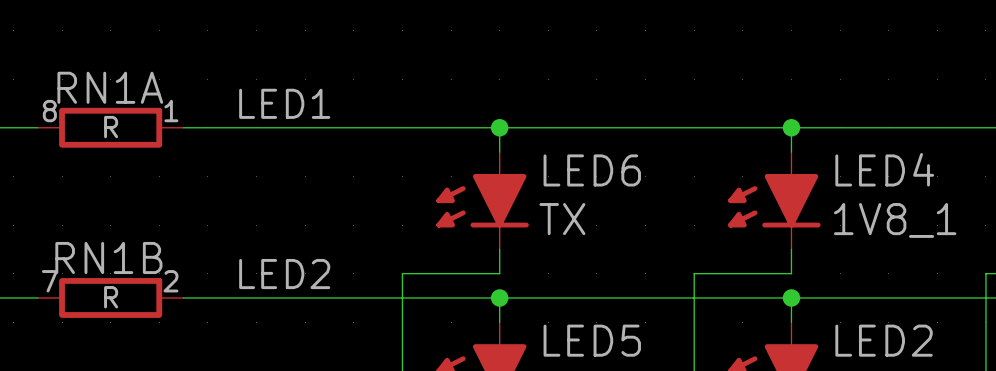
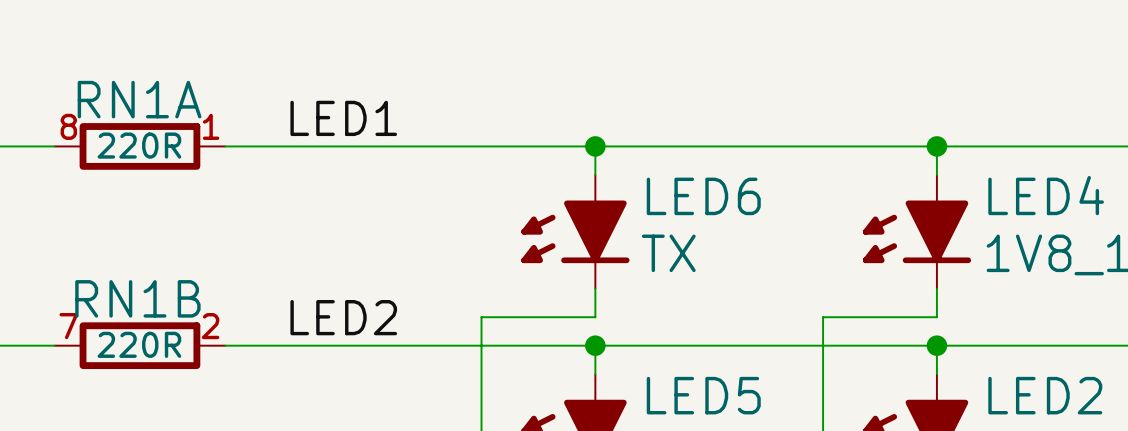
RN1A value: R (111, 127) -> 220R (139, 145)
RN1B value: R (111, 297) -> 220R (139, 344)

